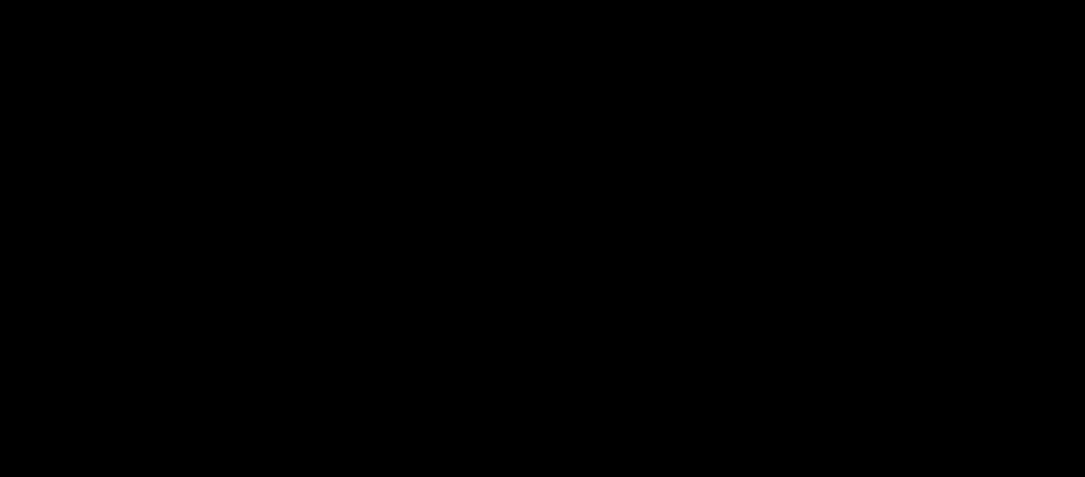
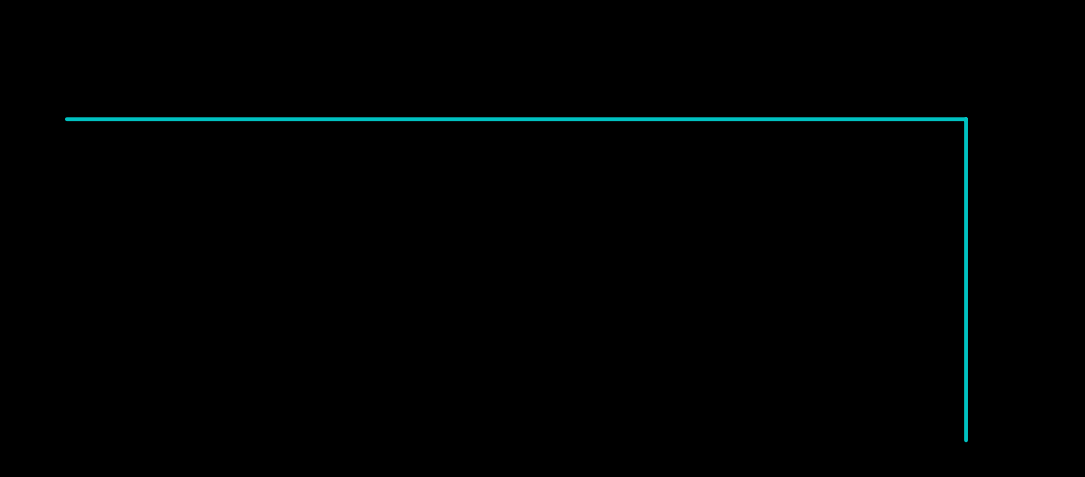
line: none -> (66, 119) (966, 119) (966, 440)

